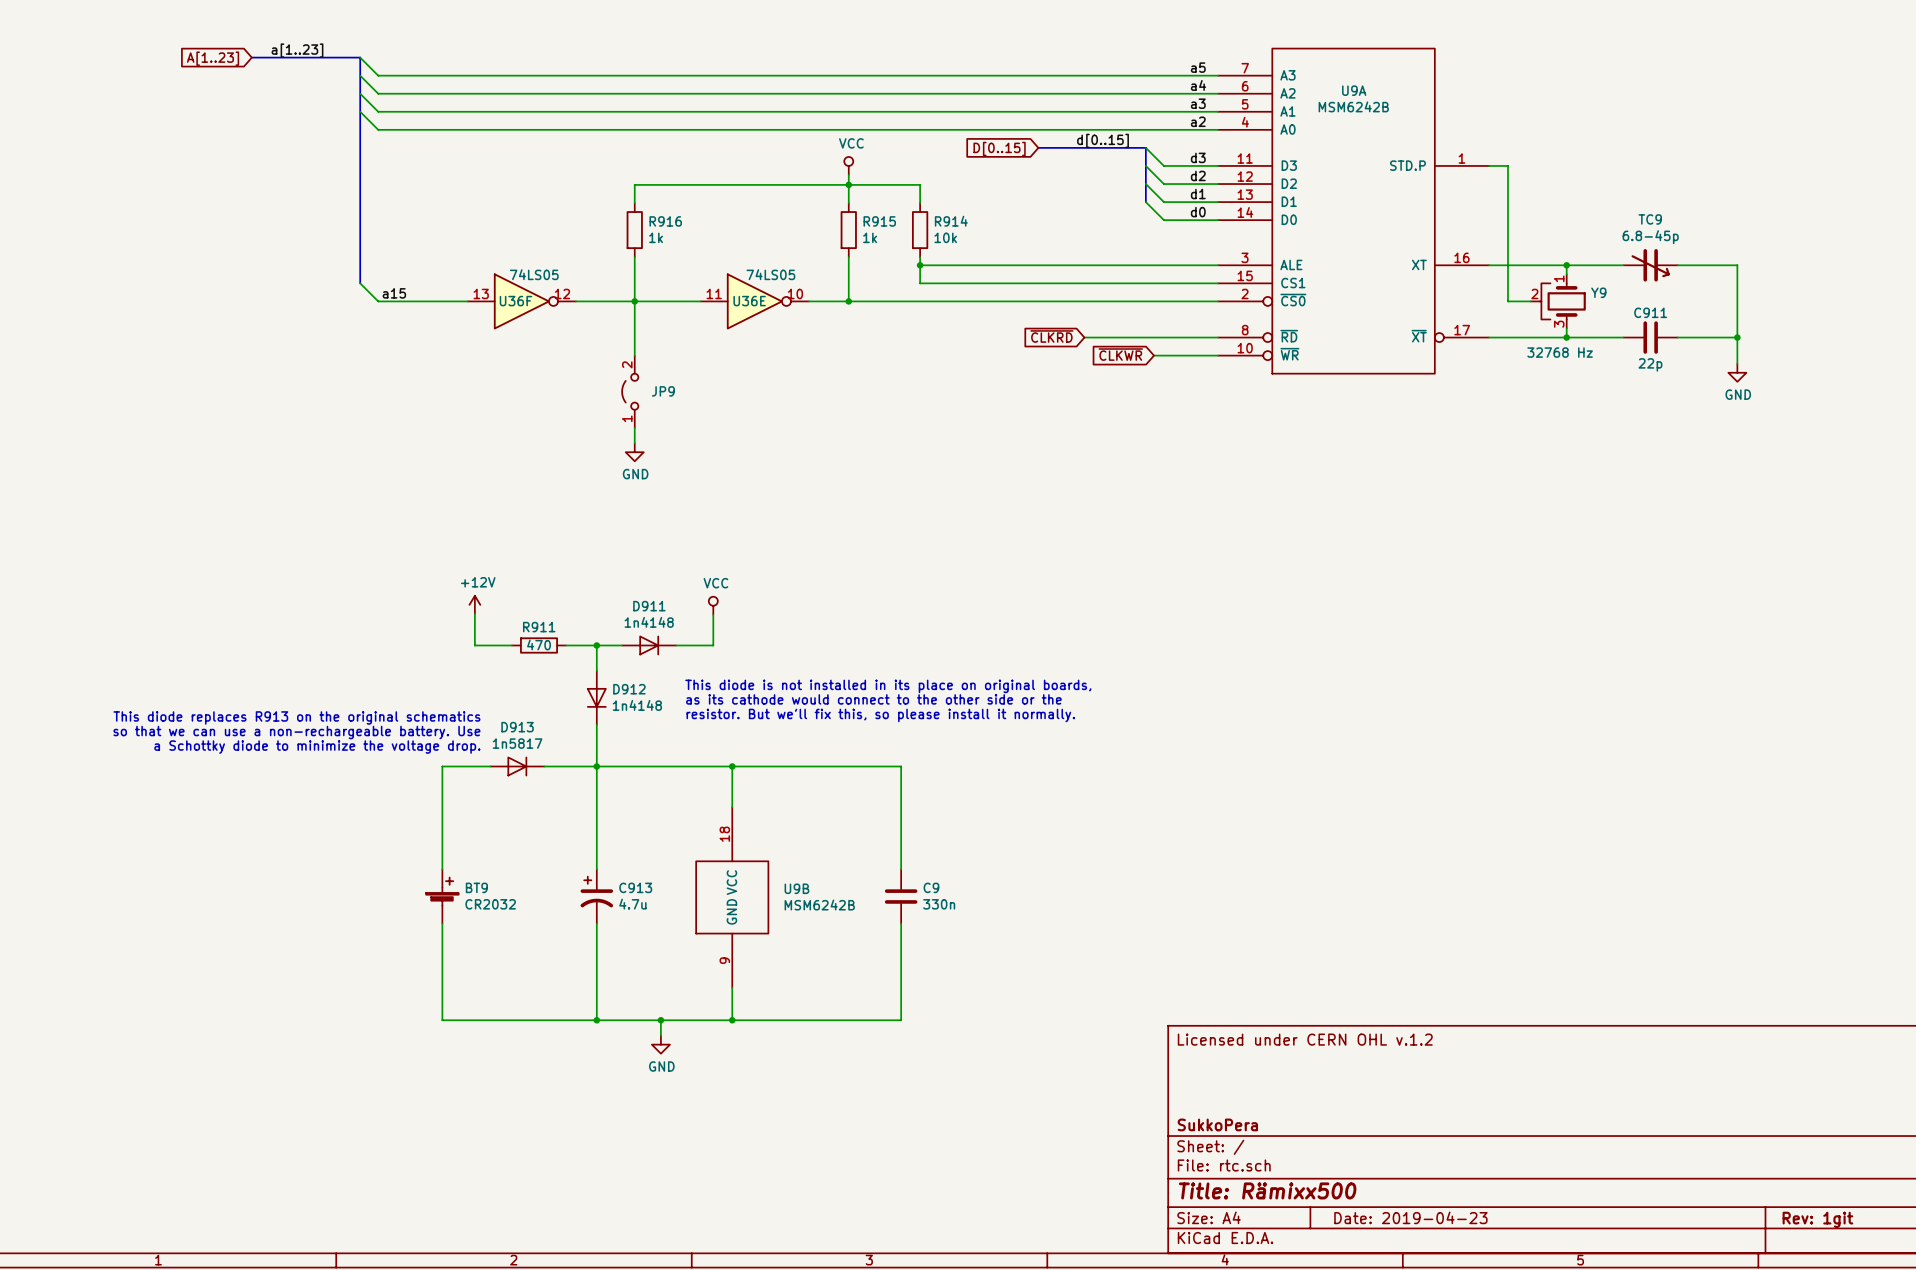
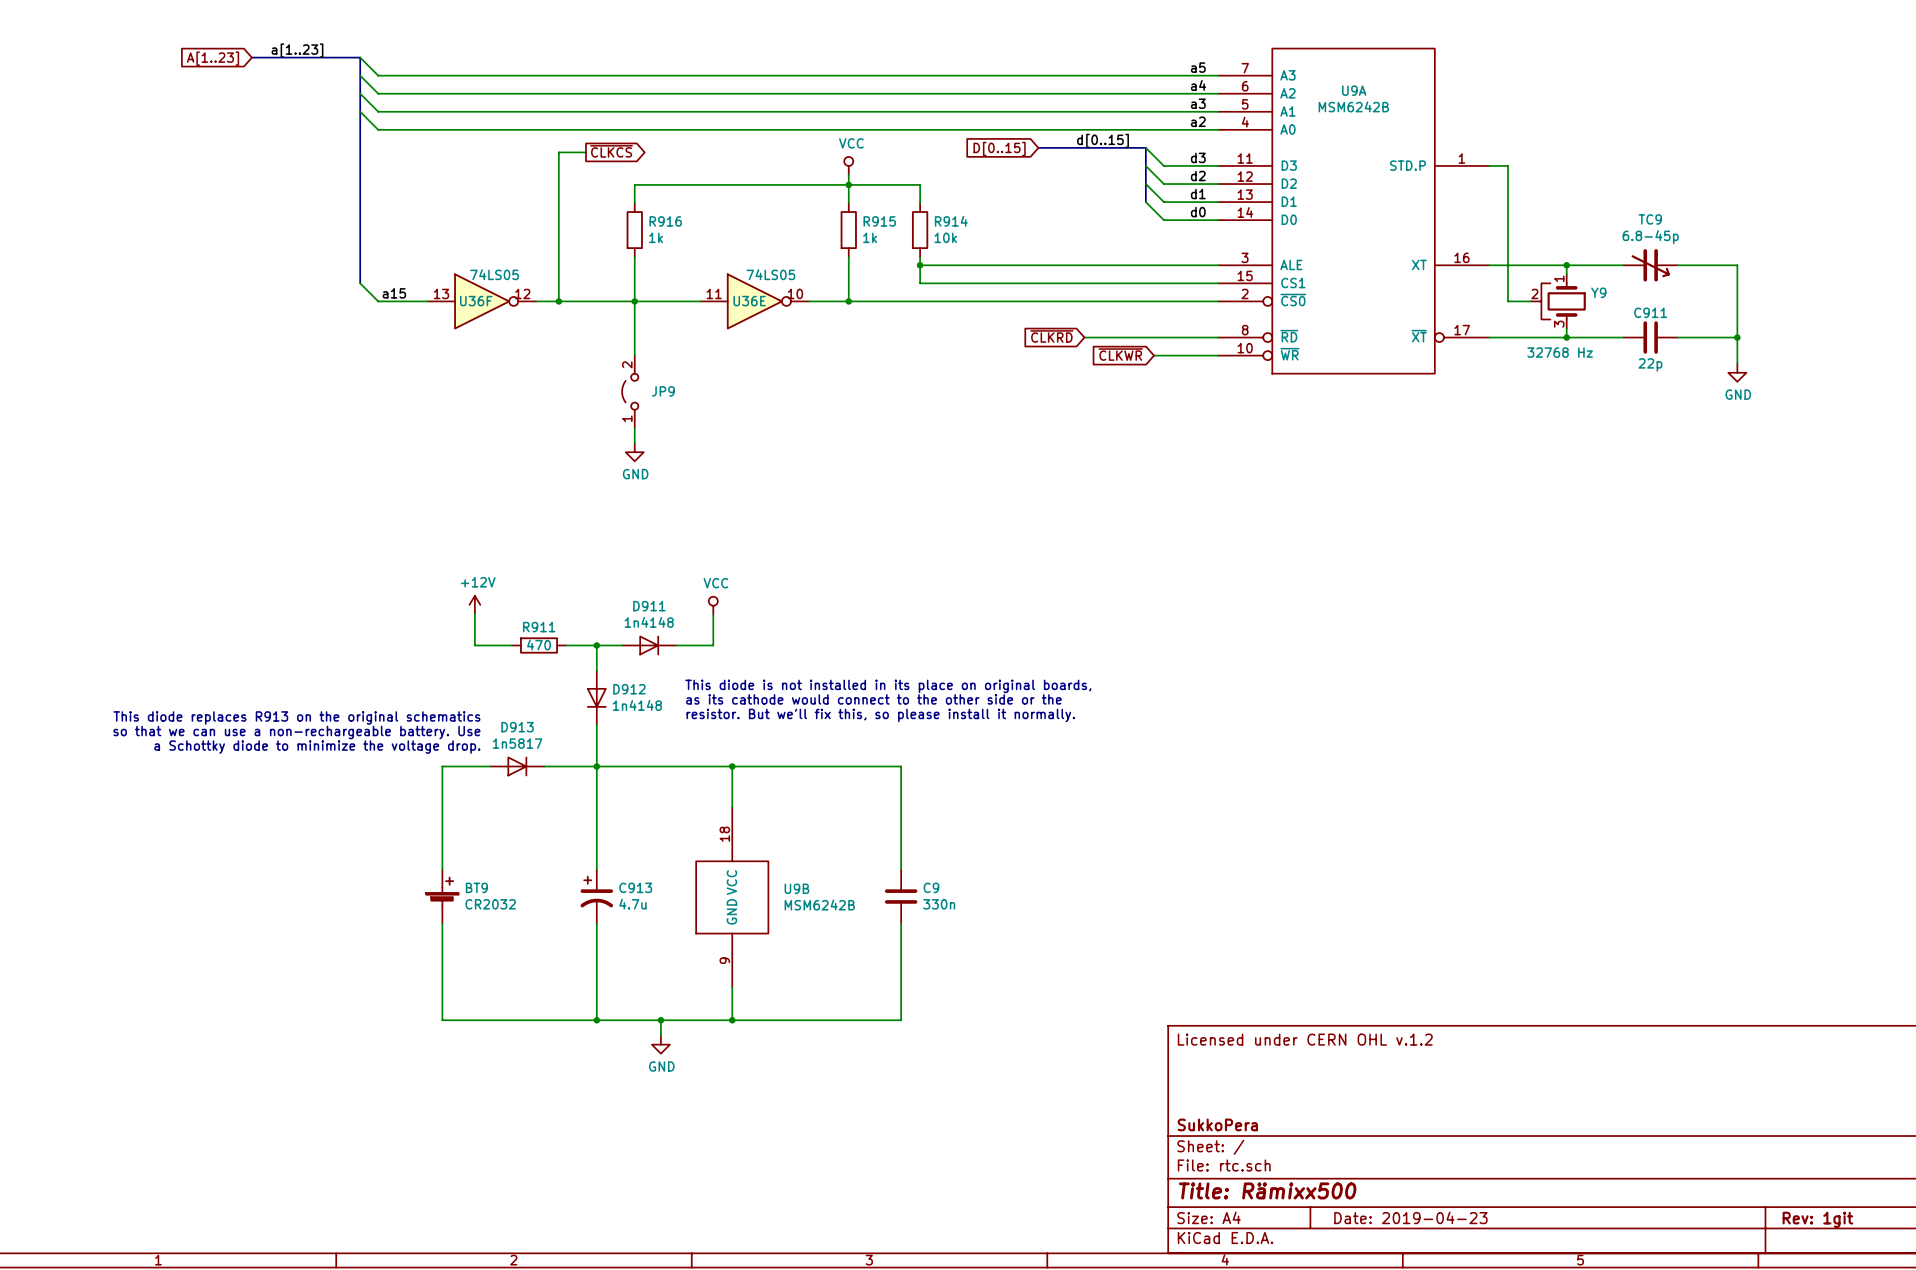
global label: none -> ~{CLKCS} (611, 151)
wire: none -> (585, 152) (558, 152) (558, 301)
U36F position: (521, 301) -> (482, 301)
junction: none -> (558, 301)

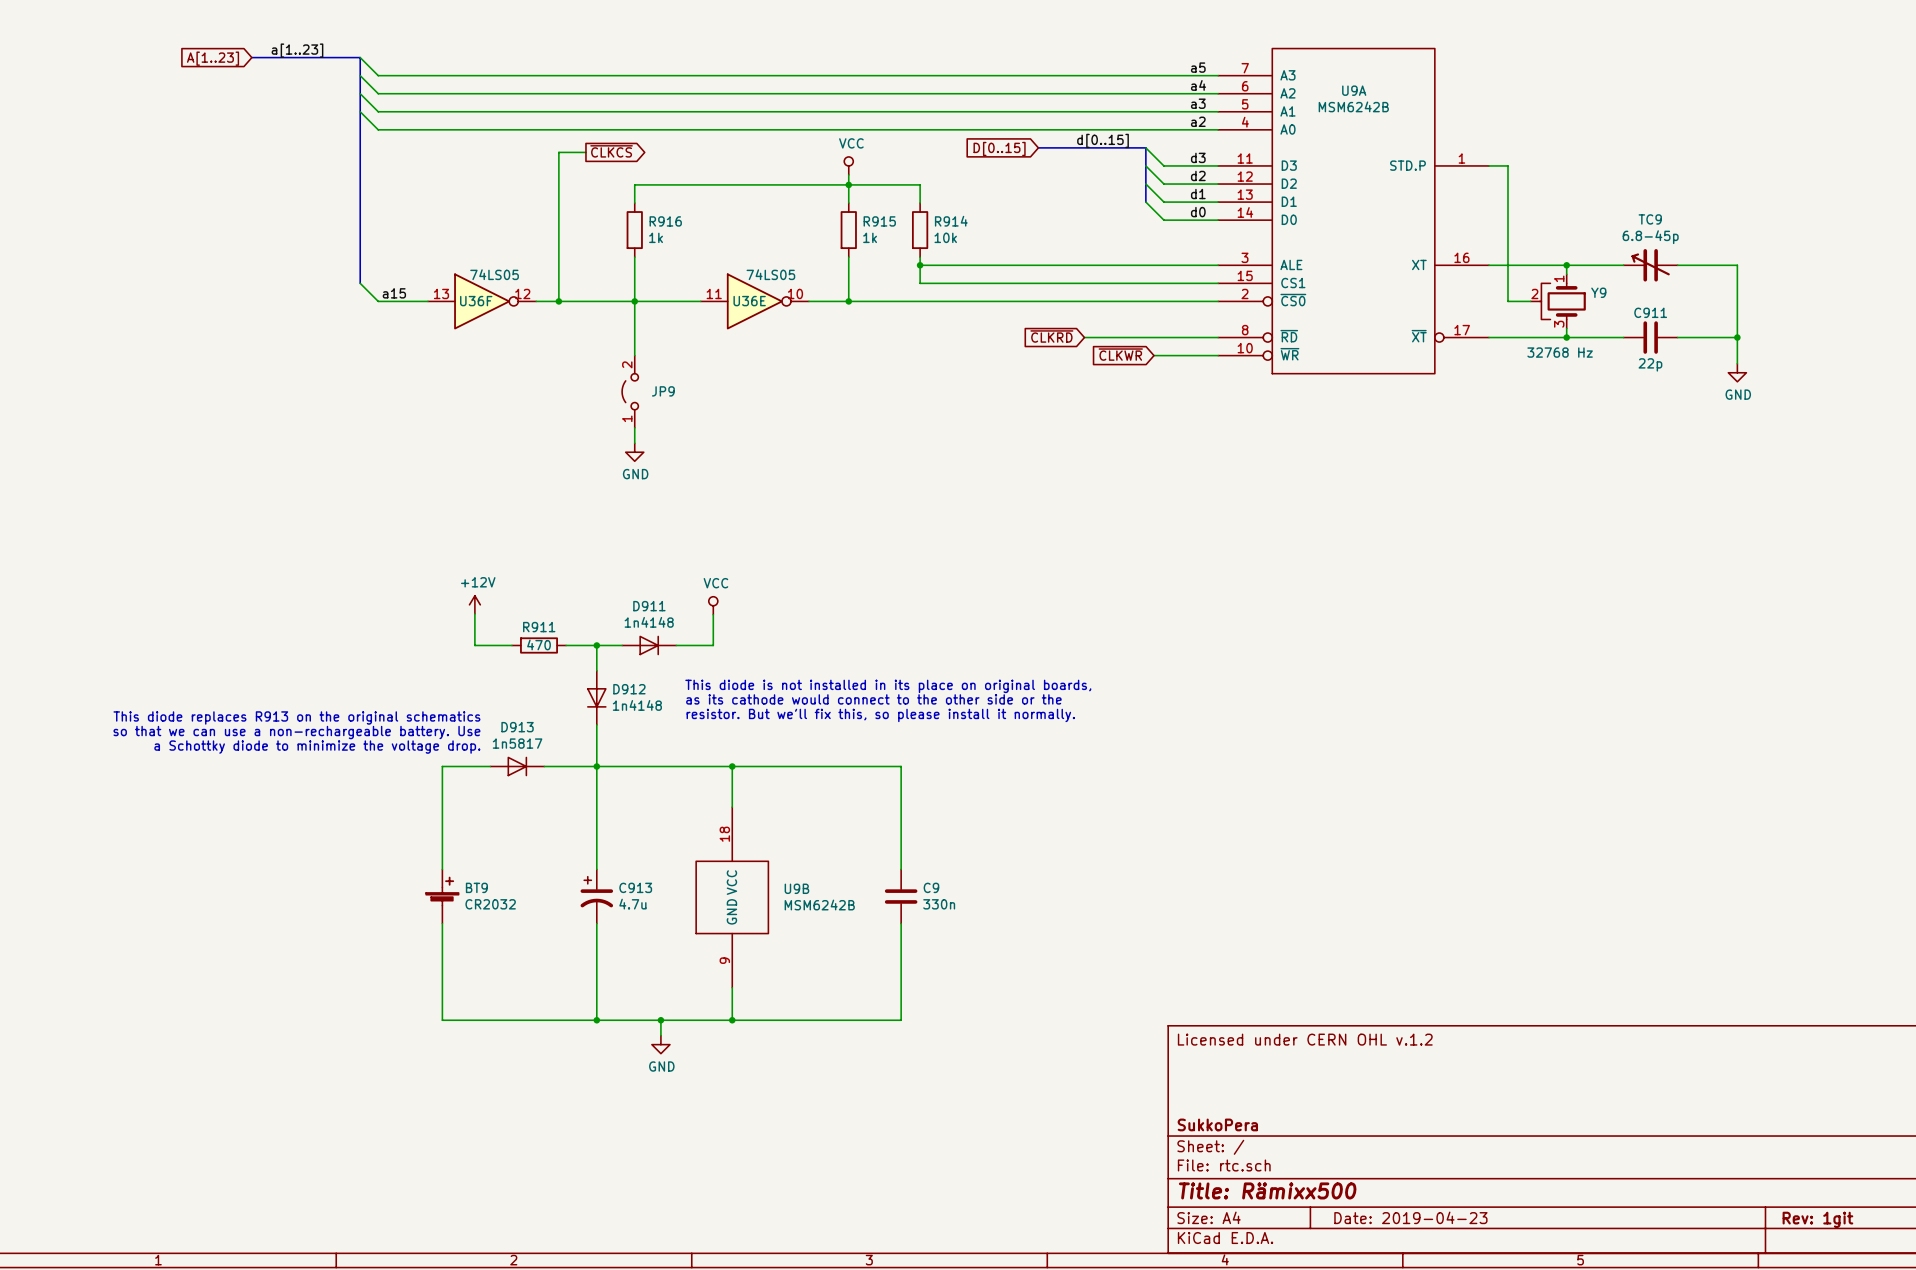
TC9 rotation: 0° (1650, 265) -> 180° (1650, 265)

